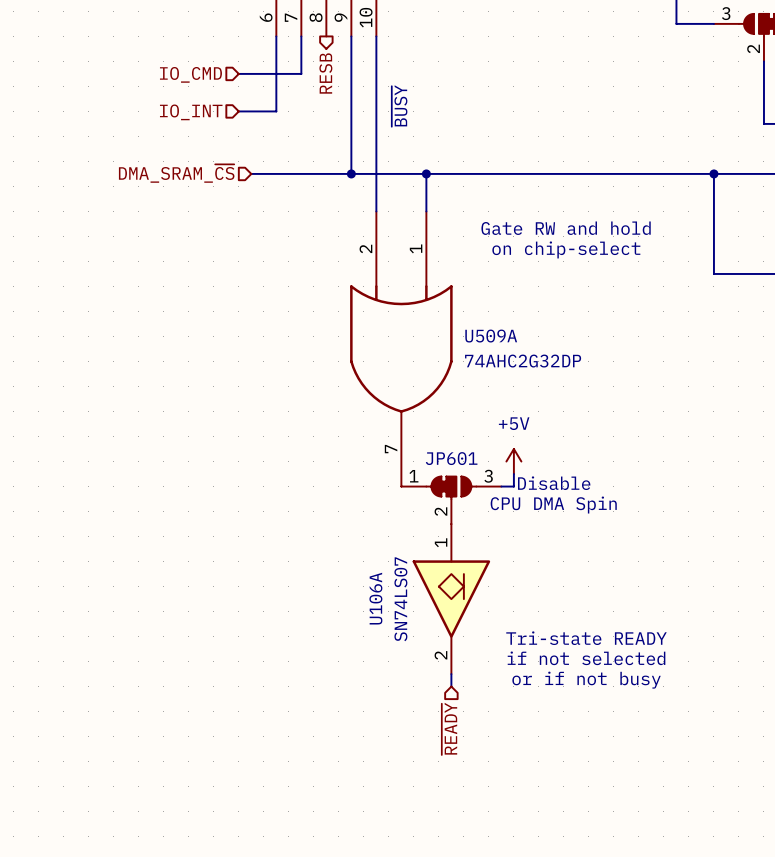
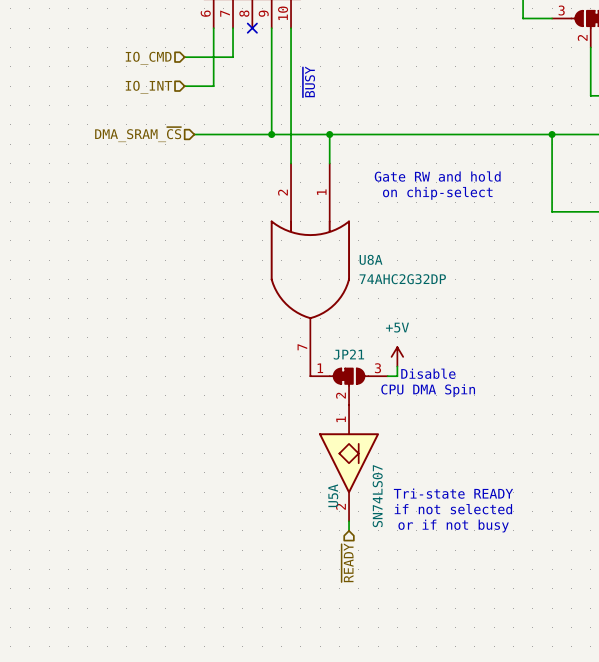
no-connect mark: none -> (252, 28)
hierarchical label: RESB (325, 73) -> none
U509A name: U509A (491, 336) -> U8A (371, 259)
JP601 name: JP601 (451, 458) -> JP21 (348, 354)
U106A name: U106A (375, 598) -> U5A (333, 495)
U106A value position: SN74LS07 (400, 599) -> SN74LS07 (377, 496)

